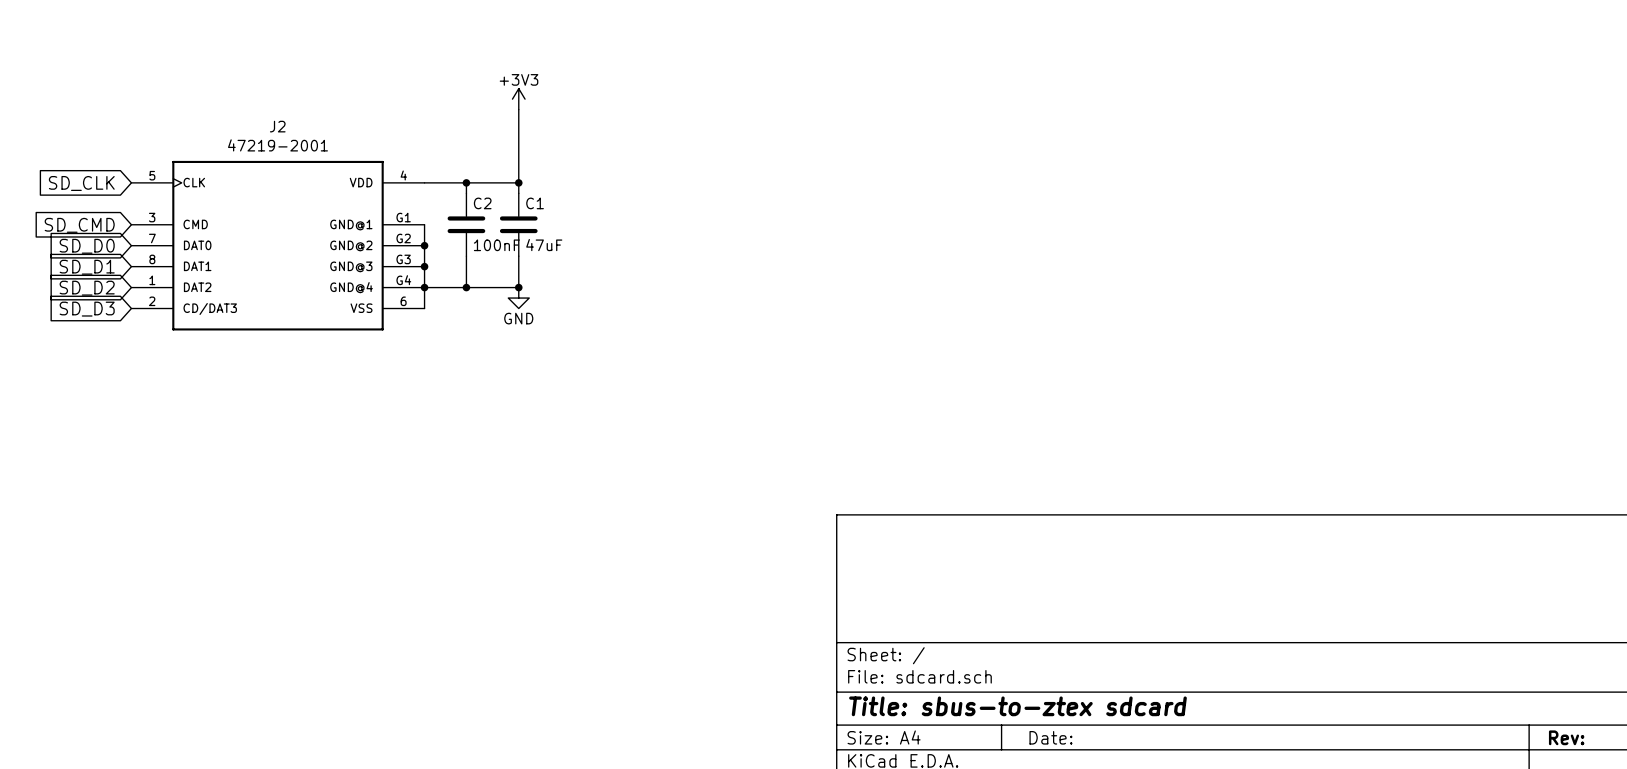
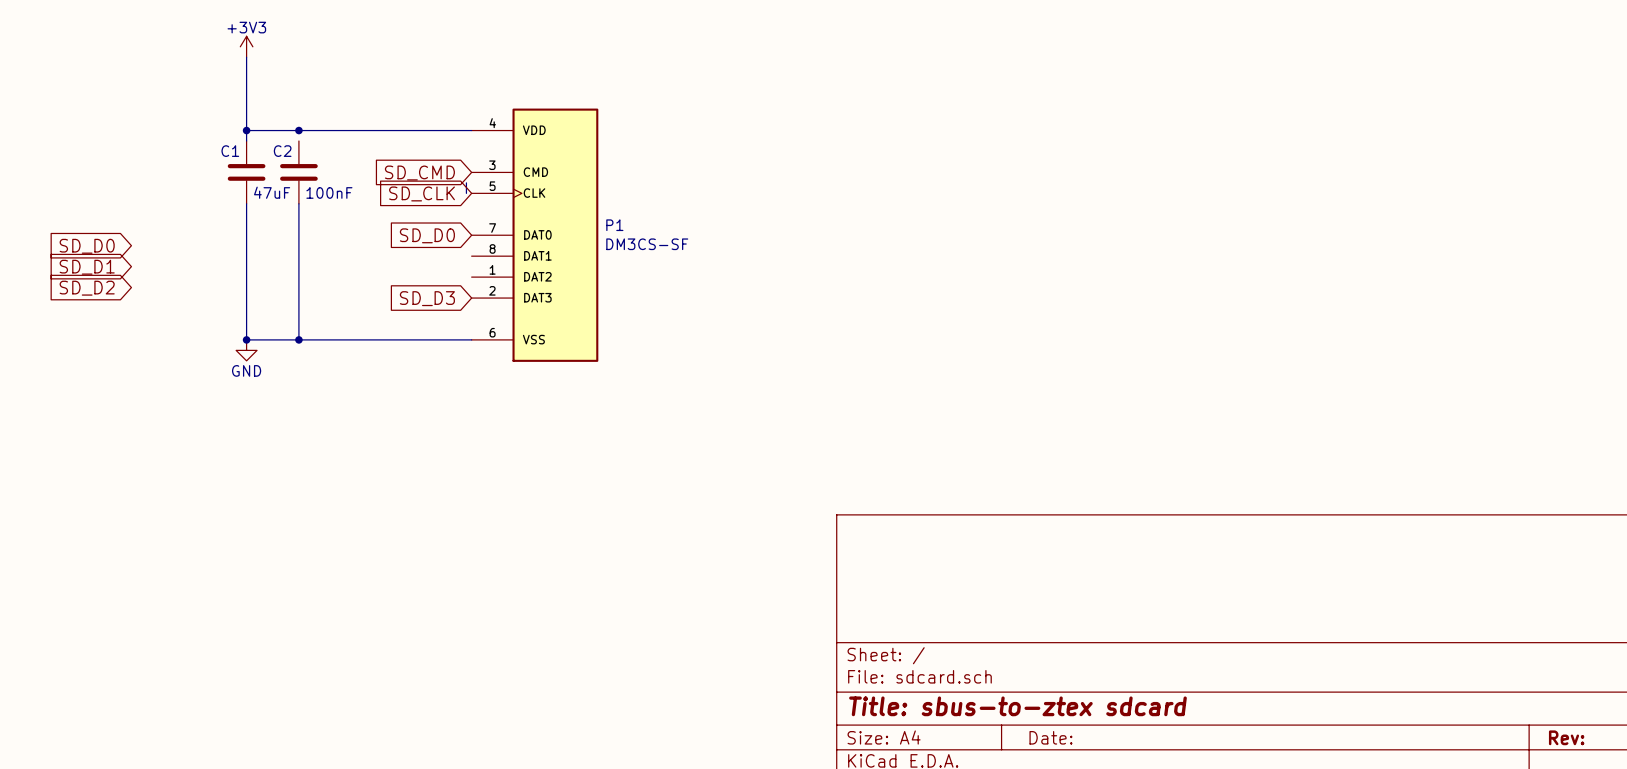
power symbol: none -> +3V3 (246, 46)
wire: none -> (246, 57) (246, 141)
power symbol: +3V3 (518, 99) -> none
wire: none -> (246, 130) (471, 130)
junction: none -> (246, 130)
junction: none -> (298, 130)
global label: none -> SD_CMD (419, 173)
wire: (424, 182) (518, 182) -> none
junction: (466, 182) -> none
junction: (518, 182) -> none
global label: SD_CLK (81, 183) -> none
global label: none -> SD_CLK (422, 193)
wire: none -> (246, 203) (246, 339) (471, 339)
wire: none -> (298, 203) (298, 339)
C2 name position: C2 (482, 203) -> C2 (282, 151)
C1 name position: C1 (535, 203) -> C1 (230, 151)
wire: (424, 224) (424, 308) -> none
C2 position: (466, 224) -> (298, 172)
C1 position: (518, 224) -> (246, 172)
global label: SD_CMD (79, 225) -> none
global label: none -> SD_D0 (427, 235)
P1: none -> DM3CS-SF (534, 235)
J2: 47219-2001 (277, 245) -> none
junction: (424, 245) -> none
wire: (466, 256) (466, 287) -> none
wire: (518, 256) (518, 287) (424, 287) -> none
junction: (424, 266) -> none
junction: (424, 287) -> none
junction: (466, 287) -> none
junction: (518, 287) -> none
global label: none -> SD_D3 (427, 298)
power symbol: GND (518, 298) -> none
global label: SD_D3 (87, 309) -> none
junction: none -> (246, 339)
junction: none -> (298, 339)
power symbol: none -> GND (246, 350)

